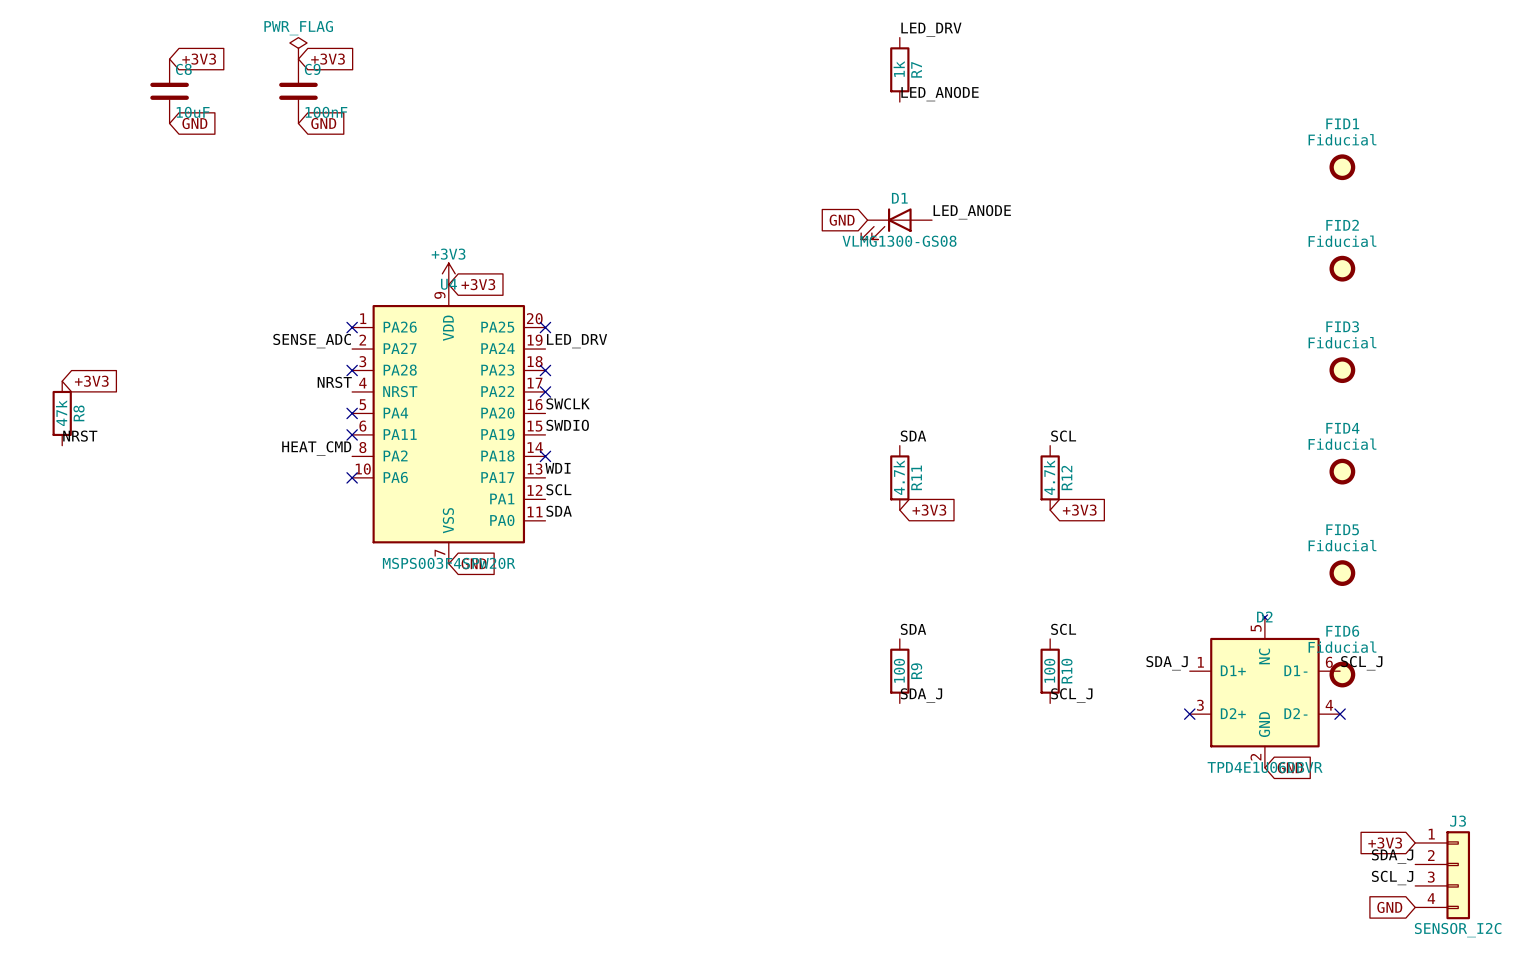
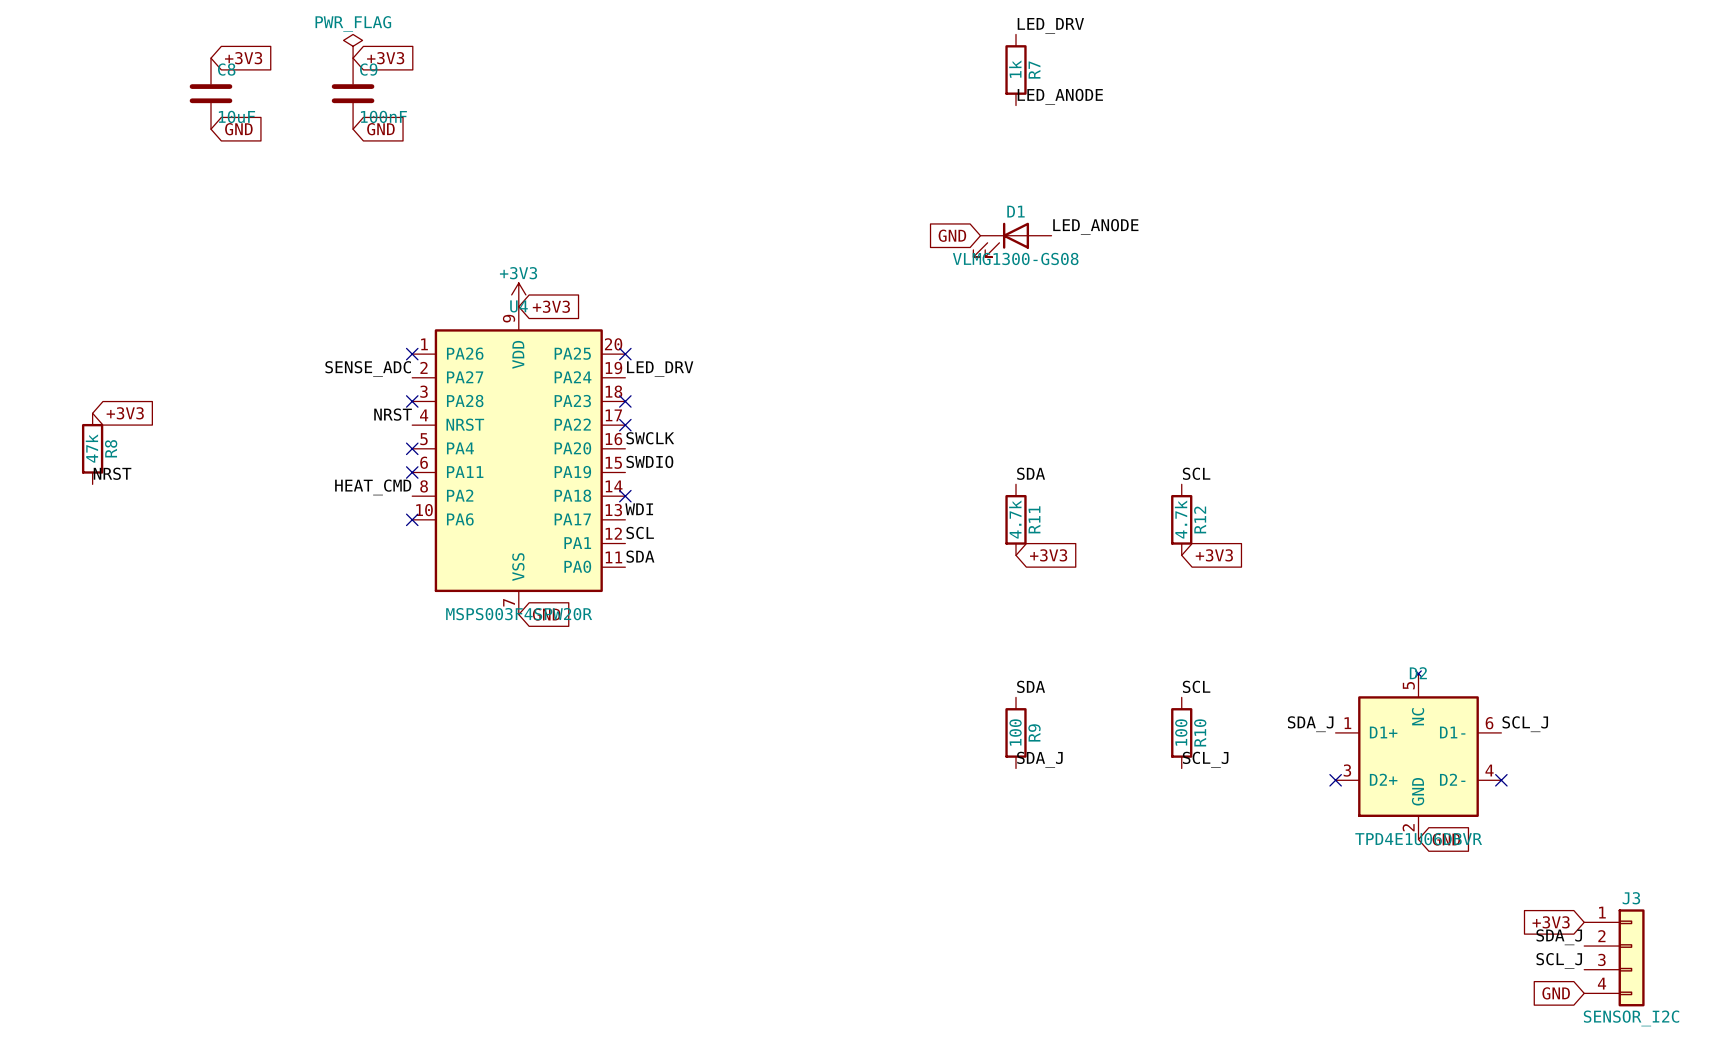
FID1: Fiducial (1342, 167) -> none
FID2: Fiducial (1342, 268) -> none
FID3: Fiducial (1342, 370) -> none
FID4: Fiducial (1342, 471) -> none
FID5: Fiducial (1342, 573) -> none
FID6: Fiducial (1342, 674) -> none

